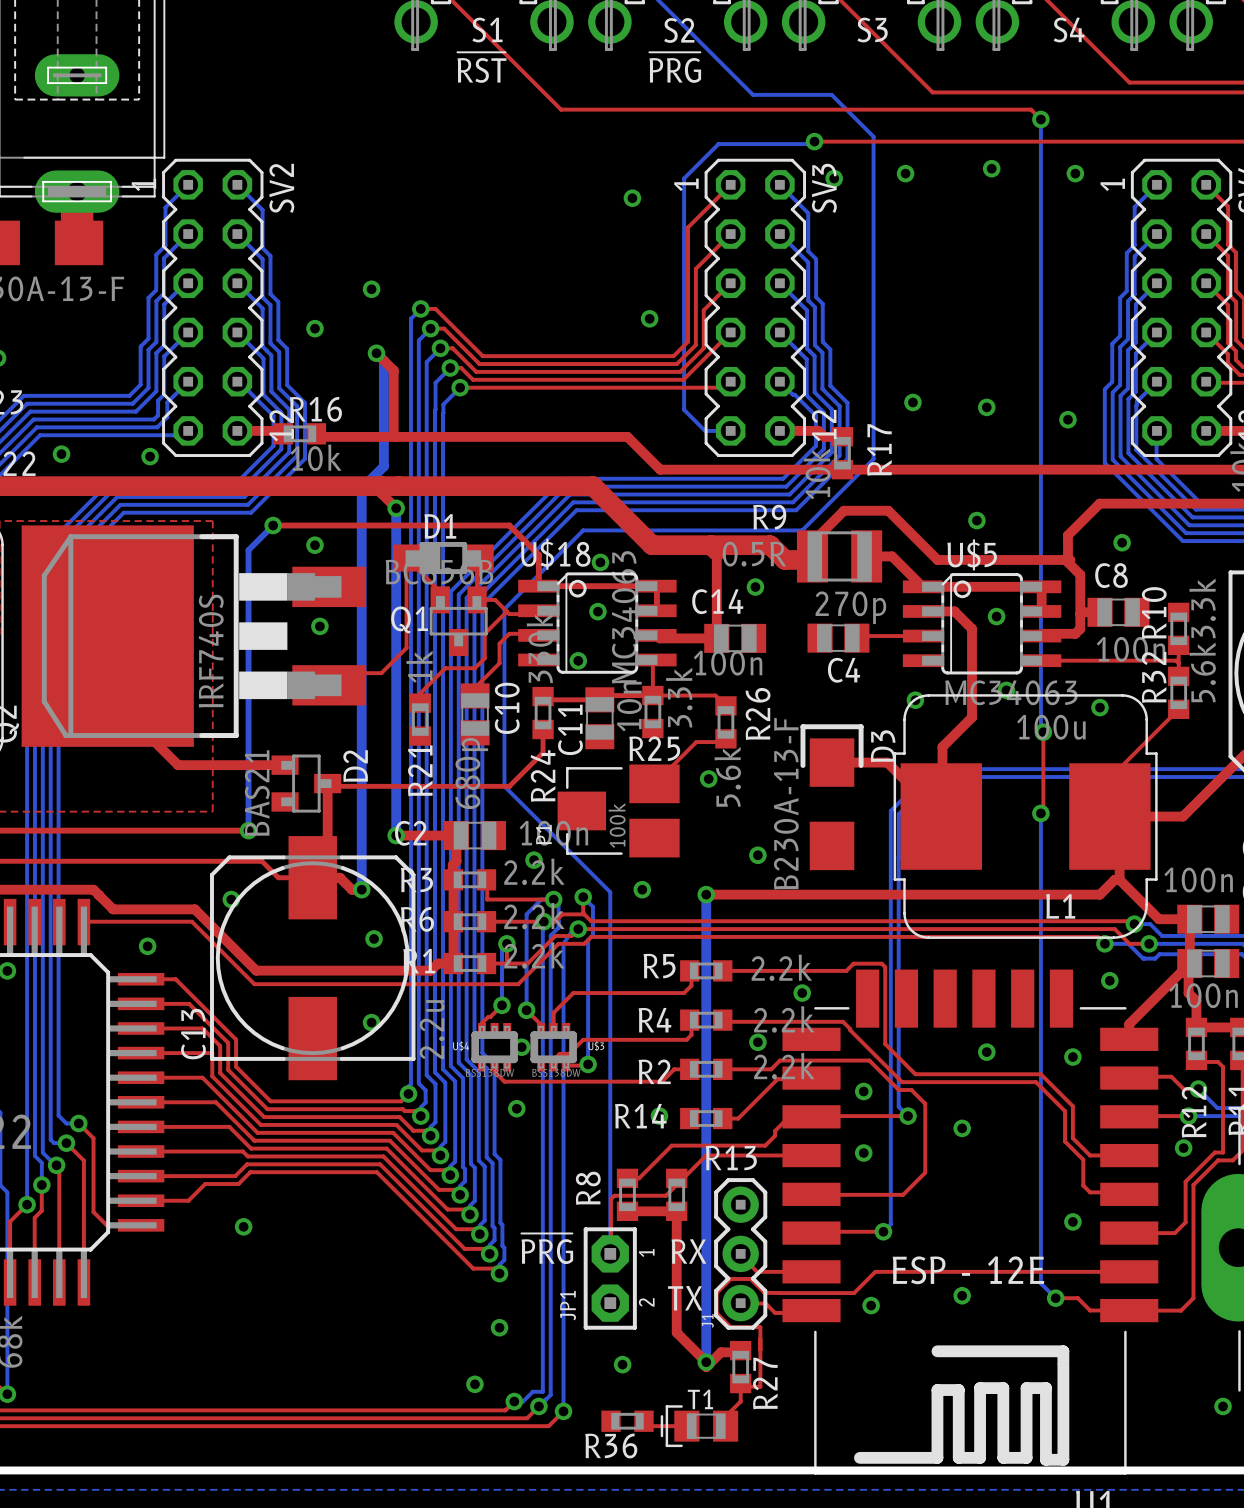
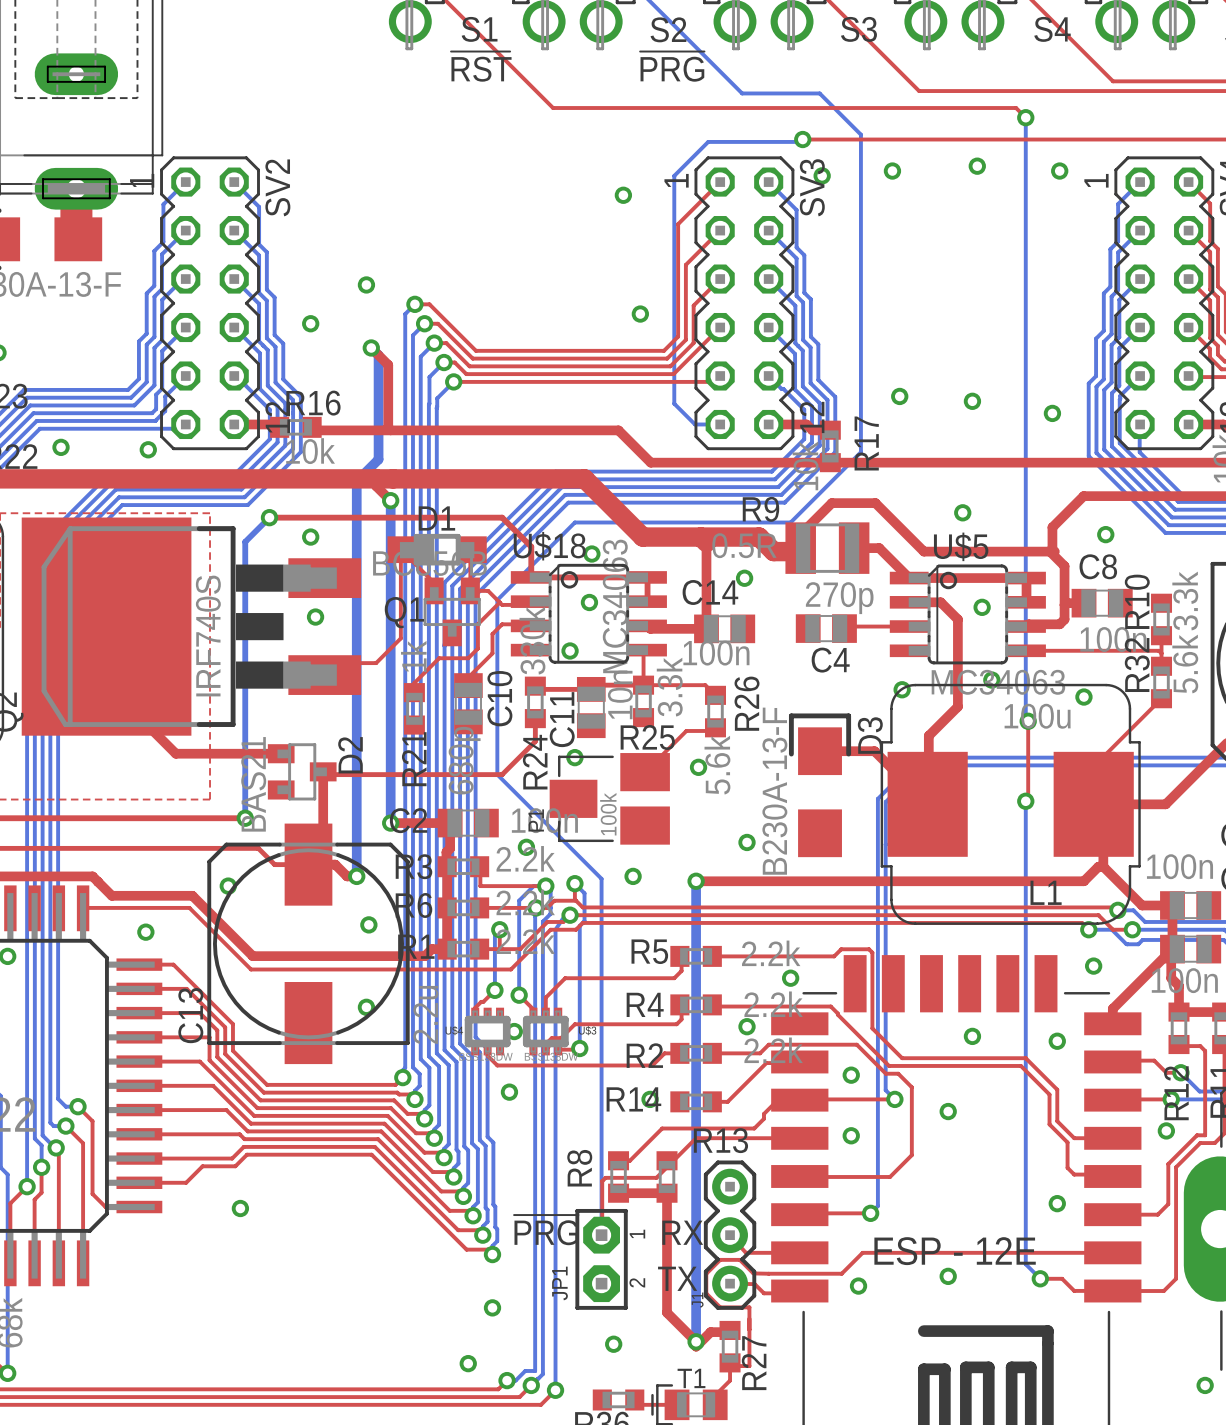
via: none -> (574, 757)

